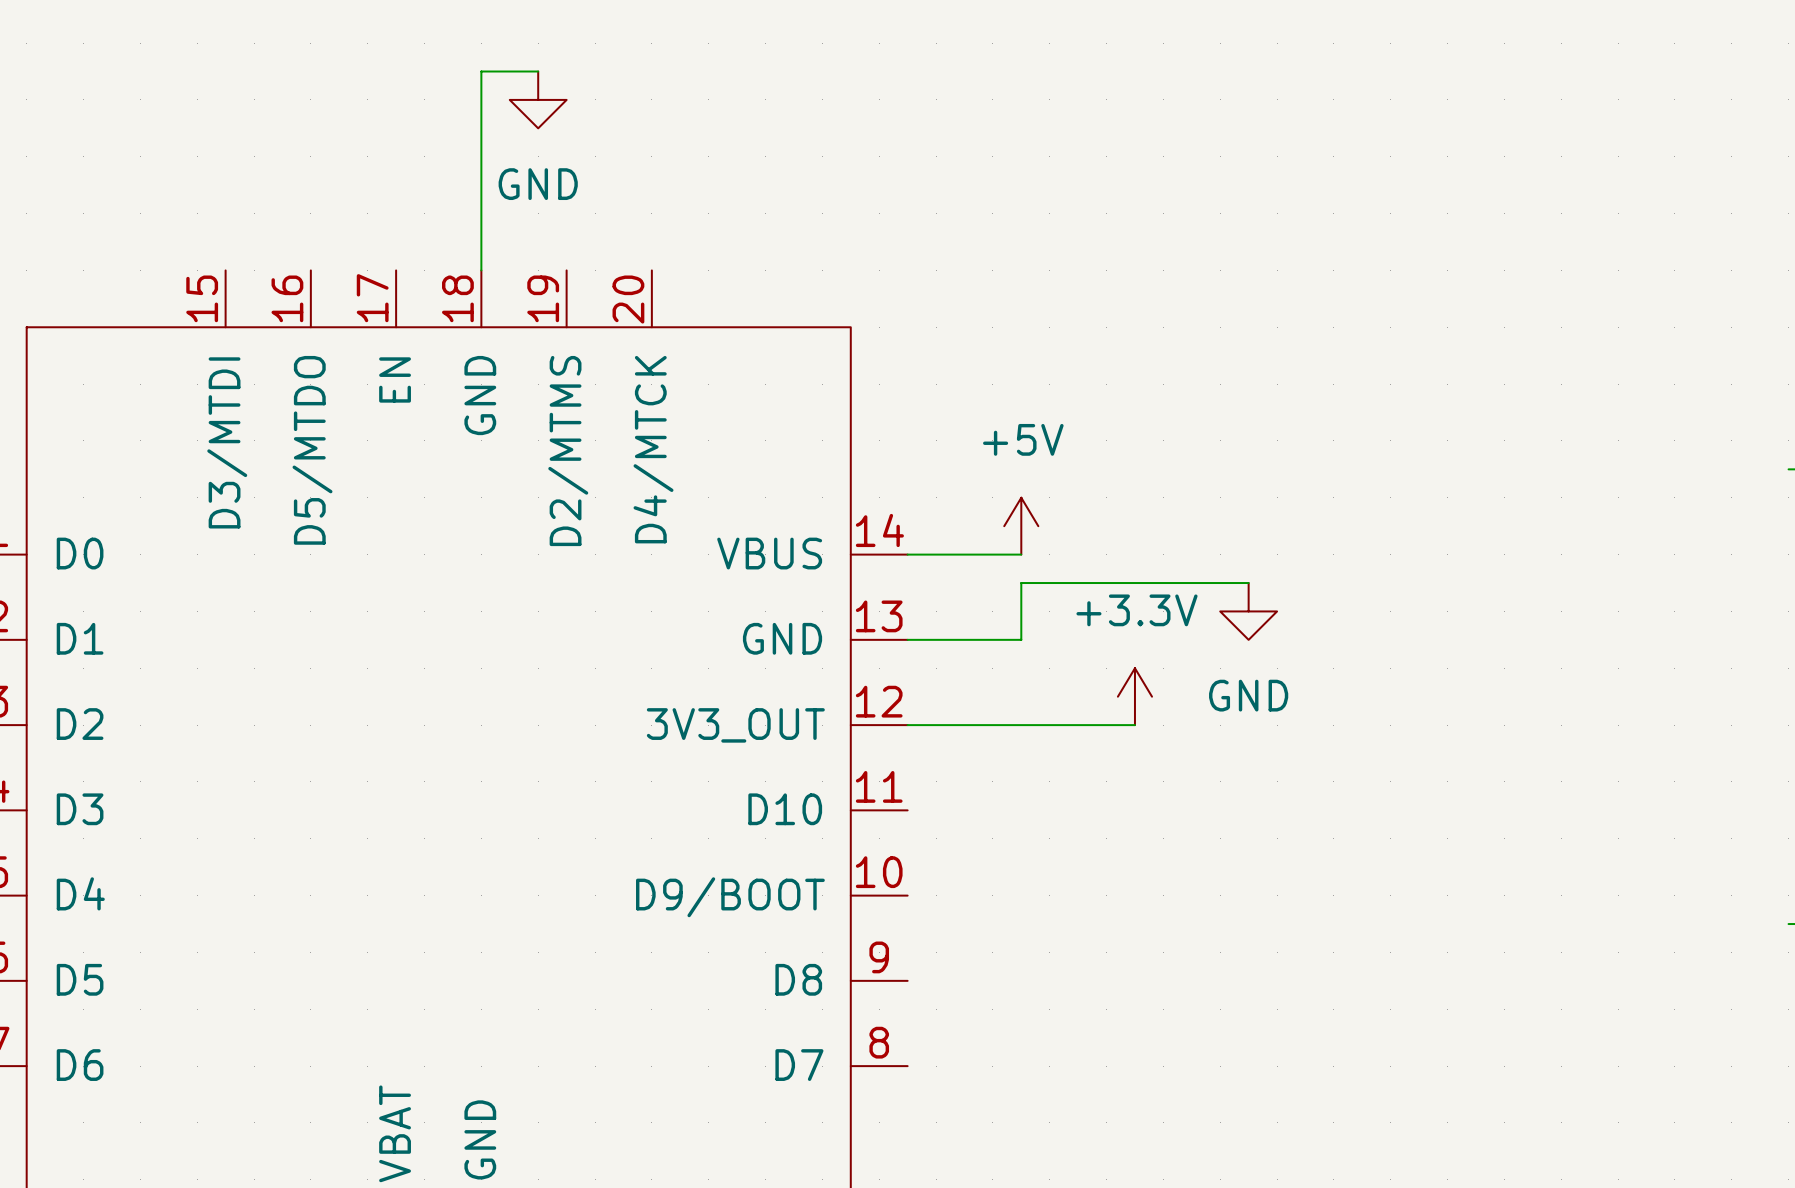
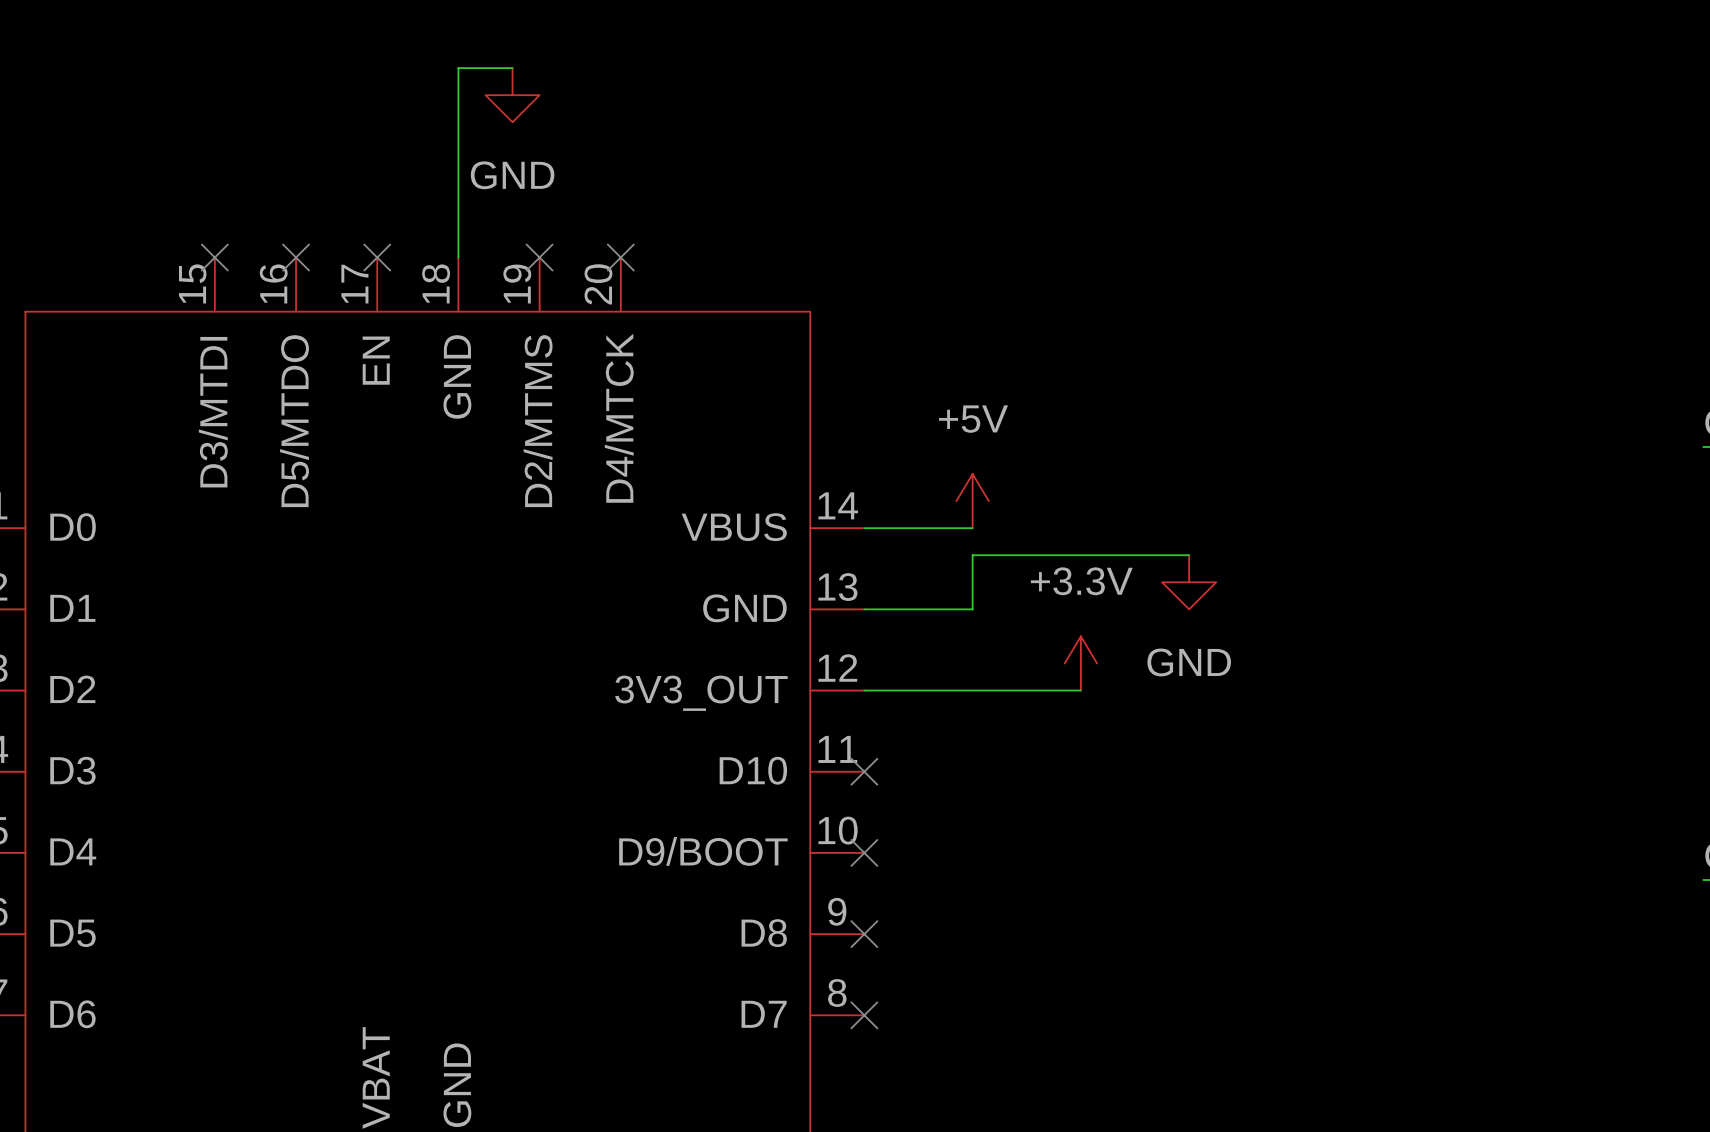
no-connect mark: none -> (214, 257)
no-connect mark: none -> (296, 257)
no-connect mark: none -> (377, 257)
no-connect mark: none -> (539, 257)
no-connect mark: none -> (620, 257)
no-connect mark: none -> (864, 771)
no-connect mark: none -> (864, 852)
no-connect mark: none -> (864, 934)
no-connect mark: none -> (864, 1015)

